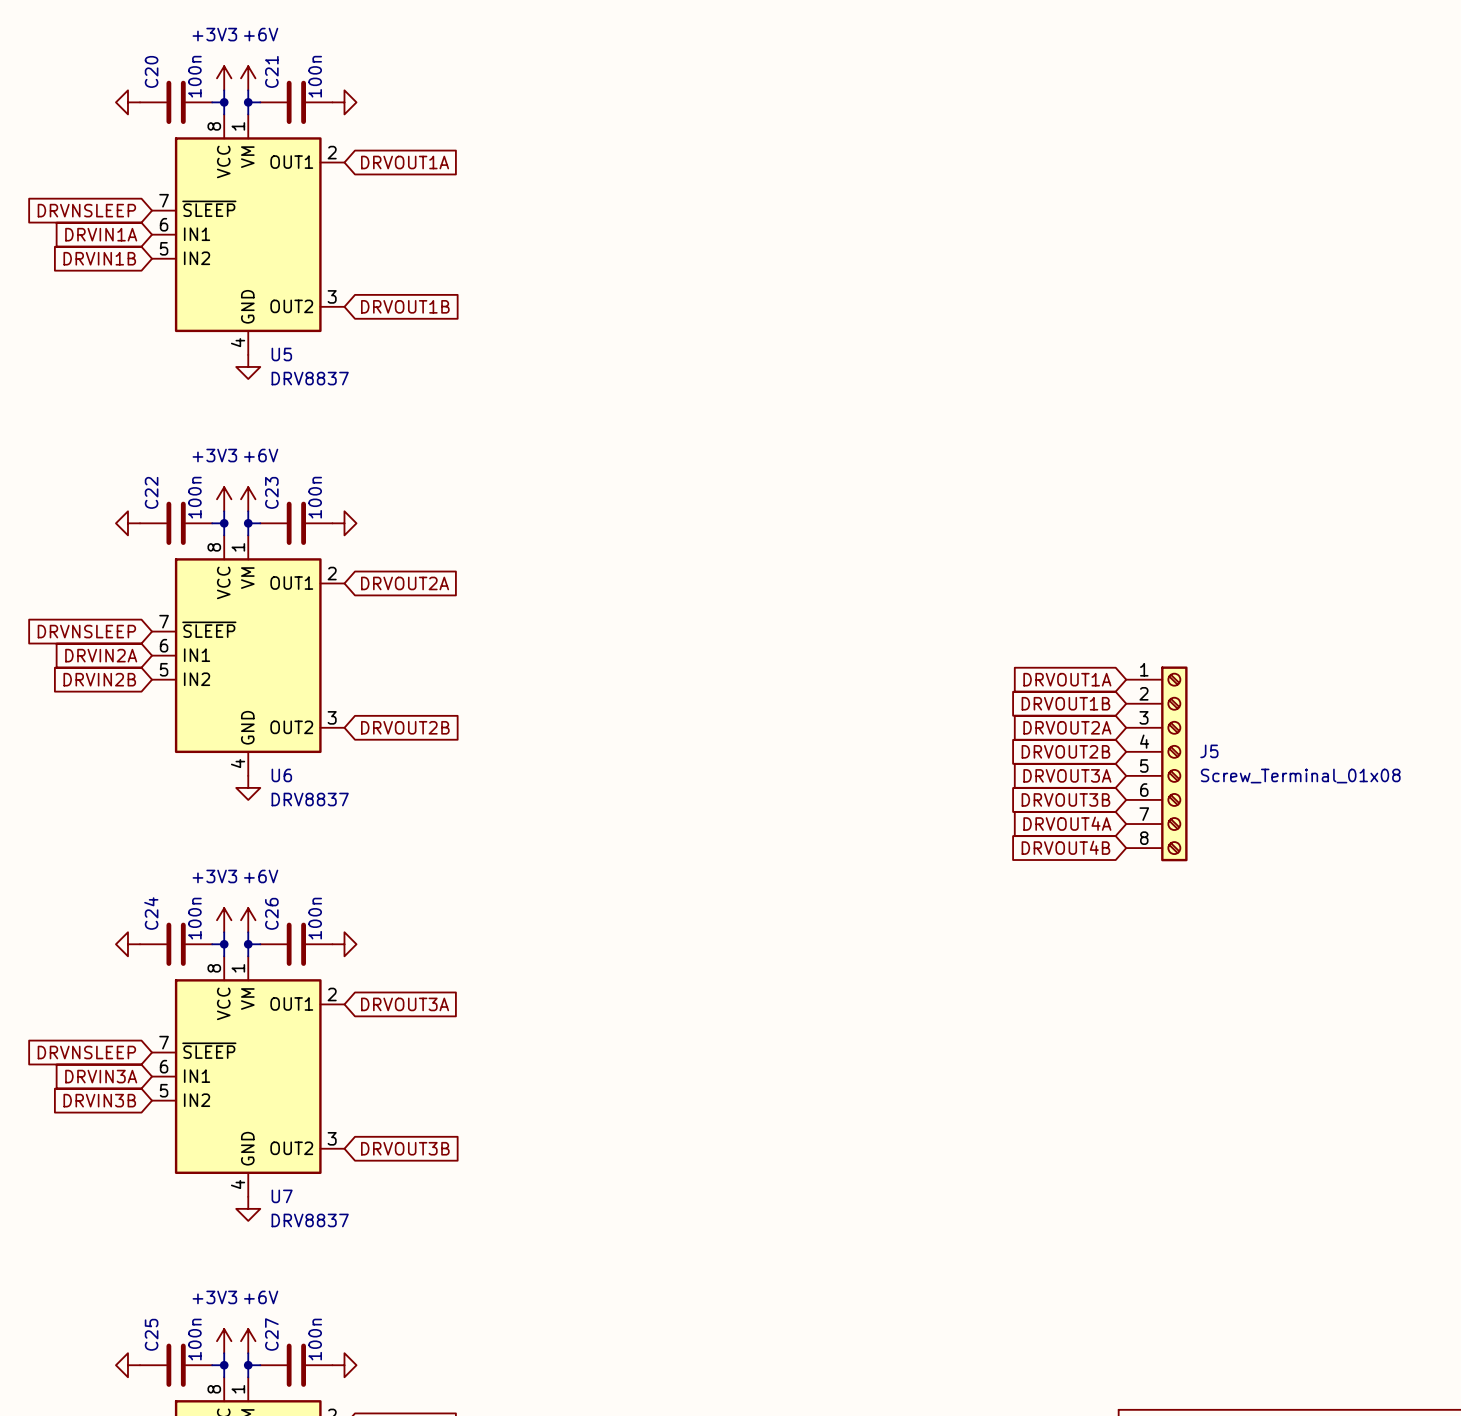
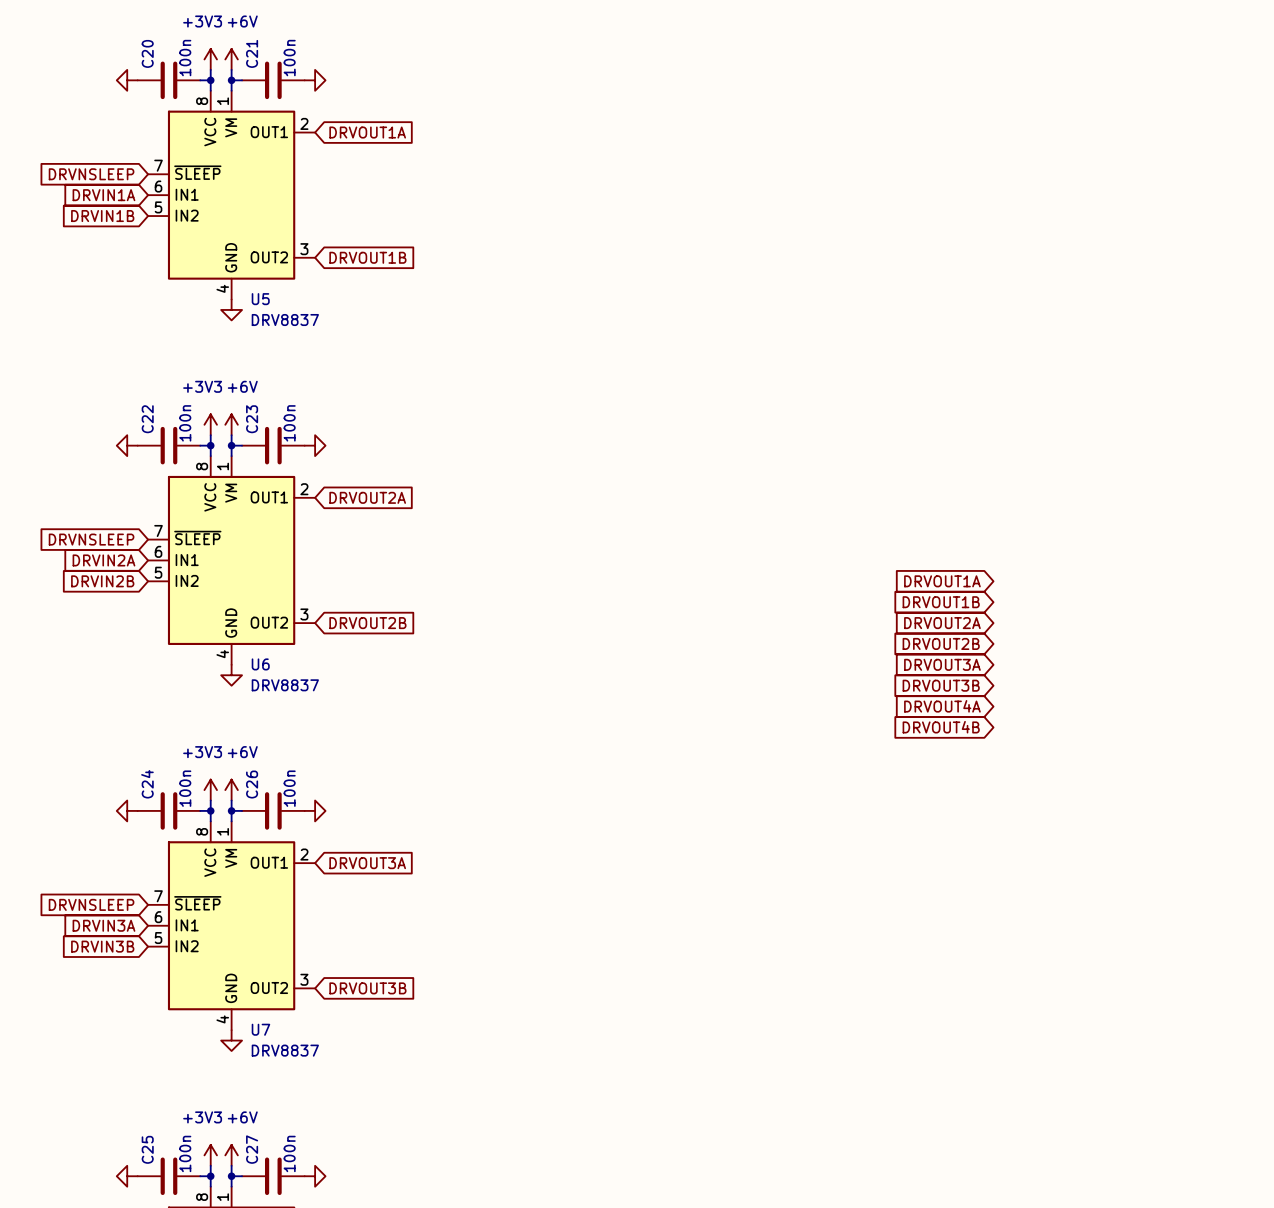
J5: Screw_Terminal_01x08 (1156, 763) -> none

